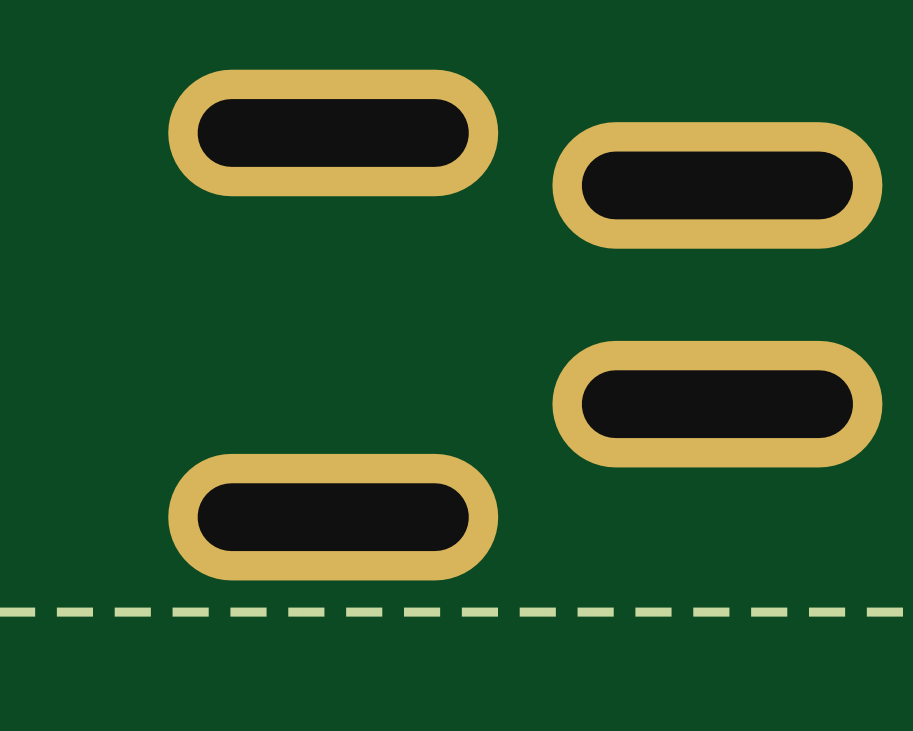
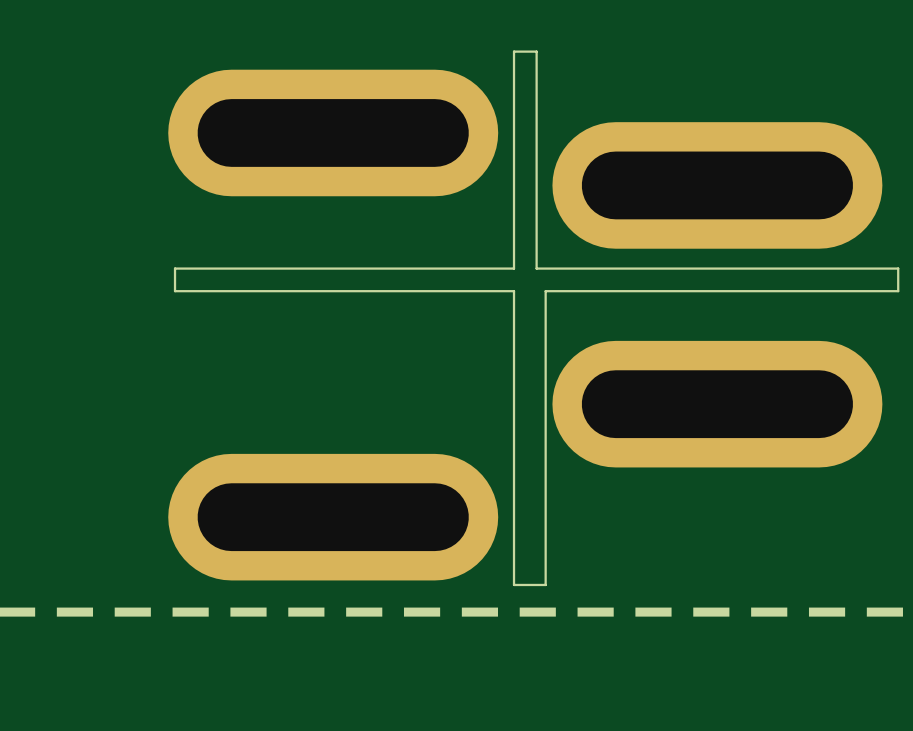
part footprint: [168, 69, 883, 581] -> [168, 50, 900, 587]

